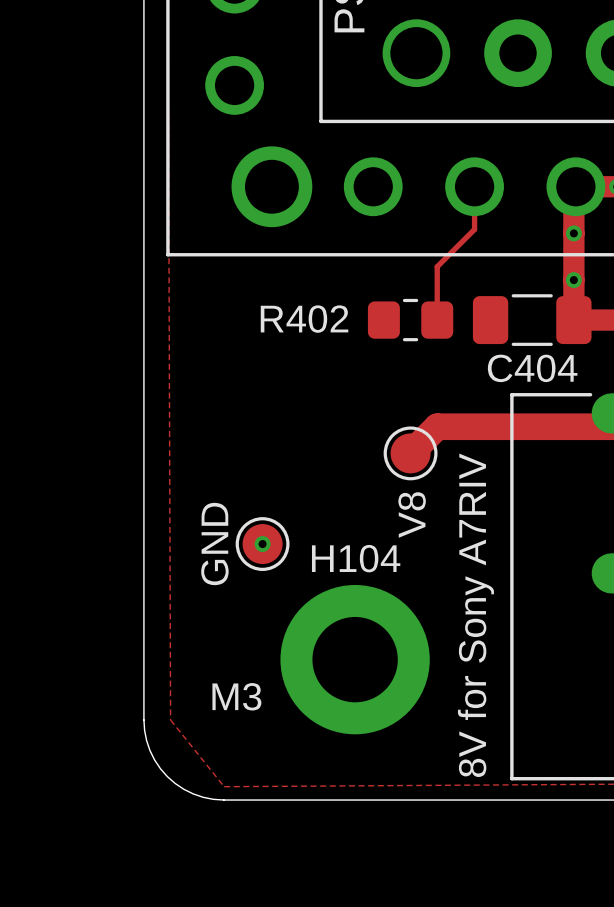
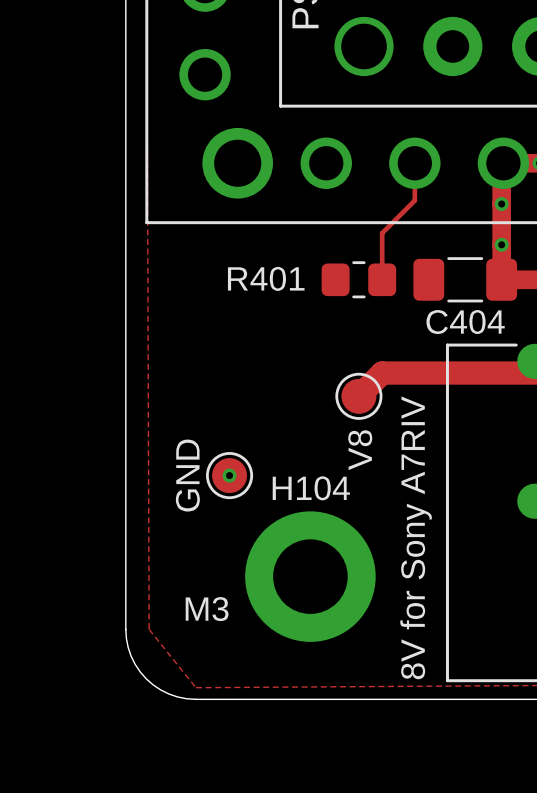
R402 name: R402 (304, 319) -> R401 (266, 278)

